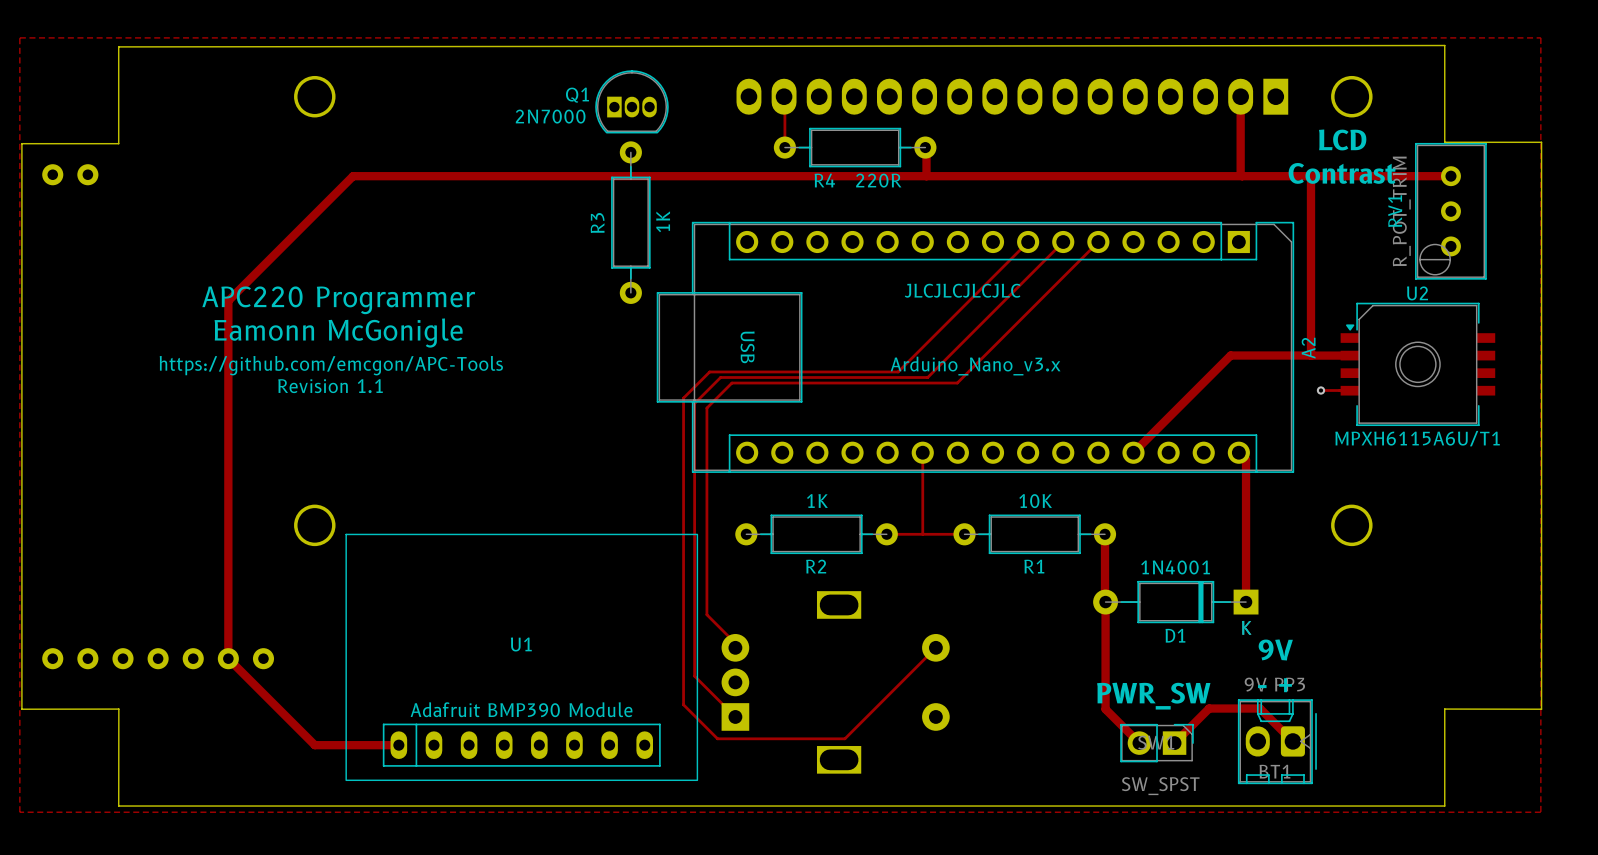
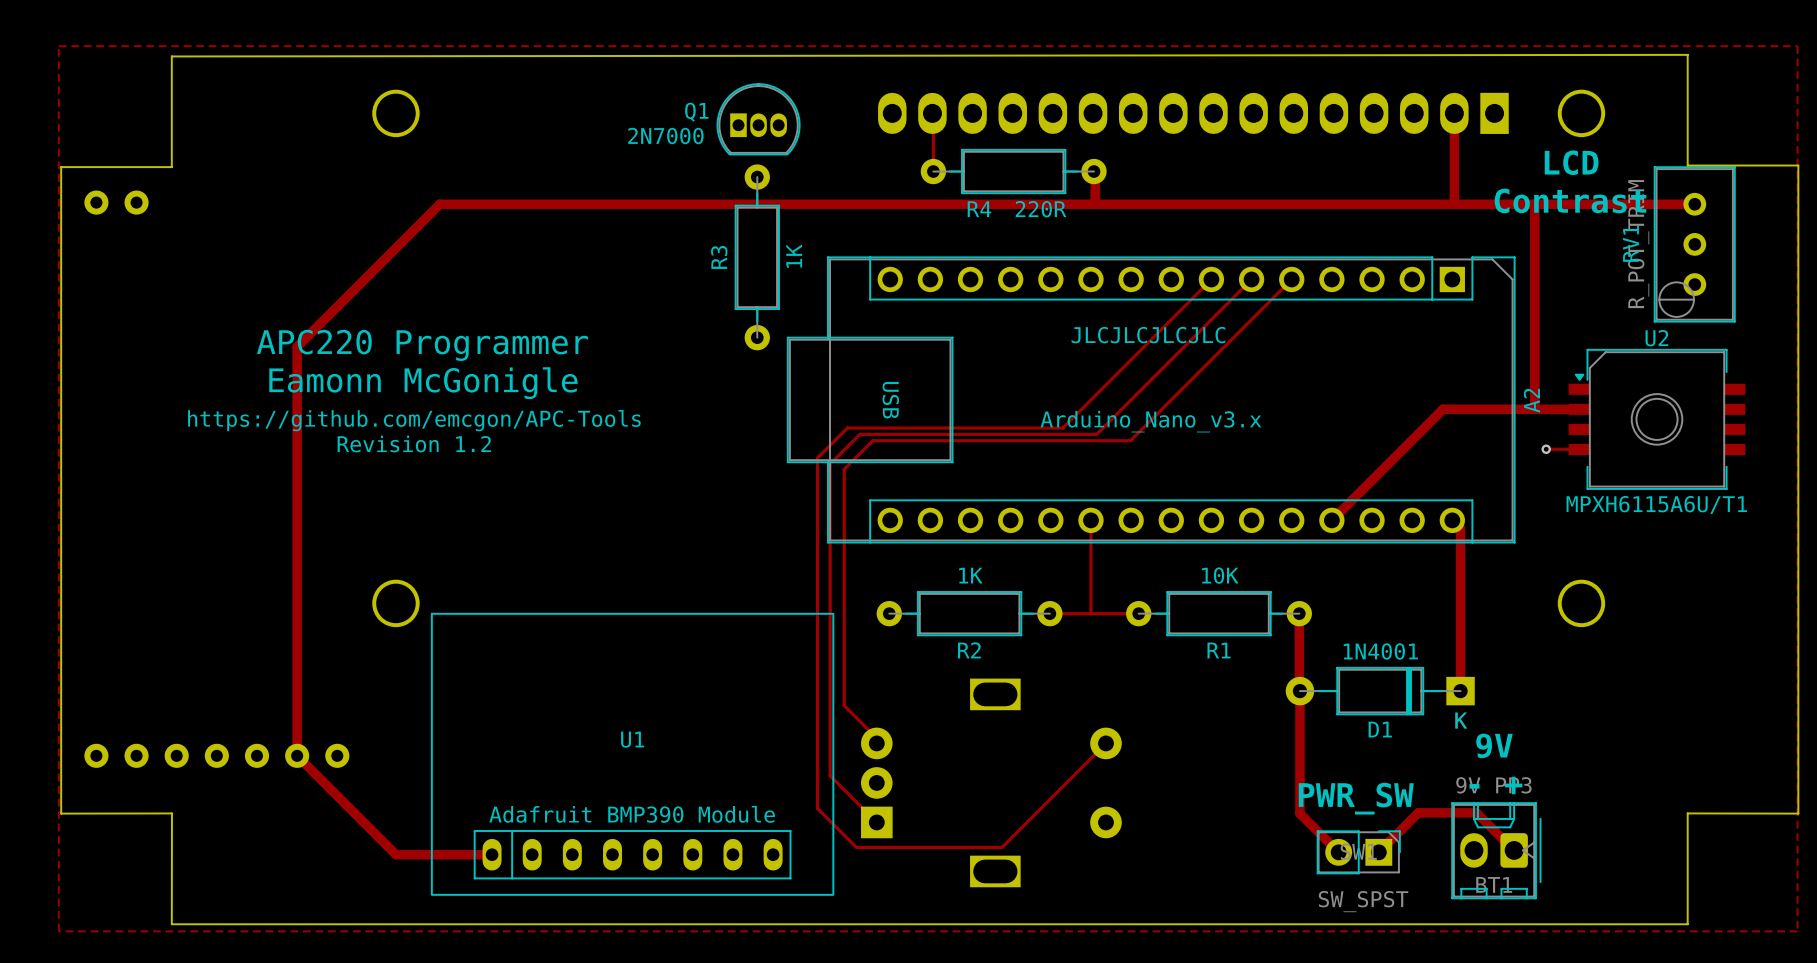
text: Revision 1.1 (330, 386) -> Revision 1.2 (414, 443)

